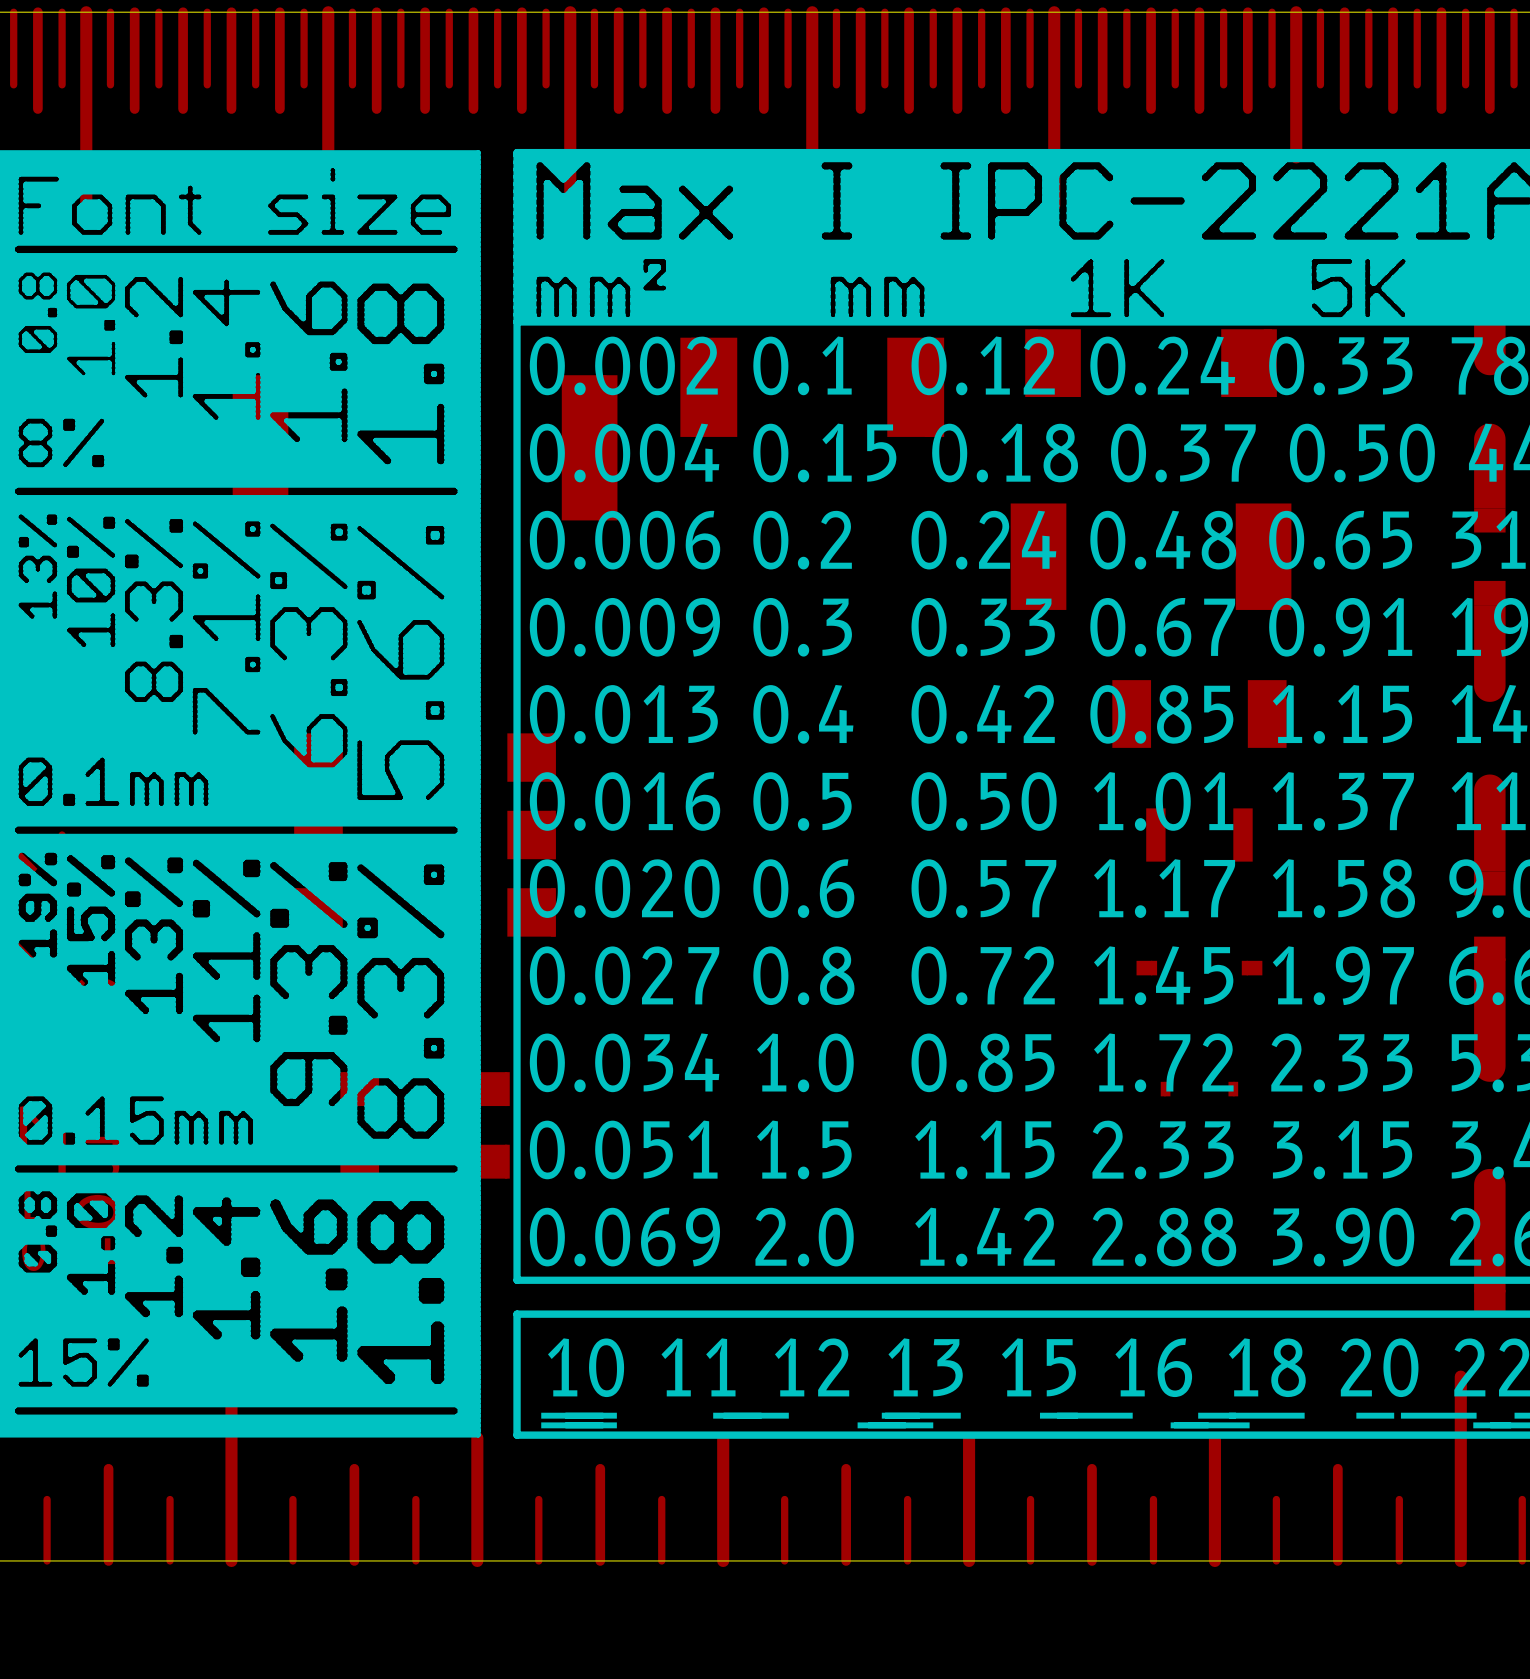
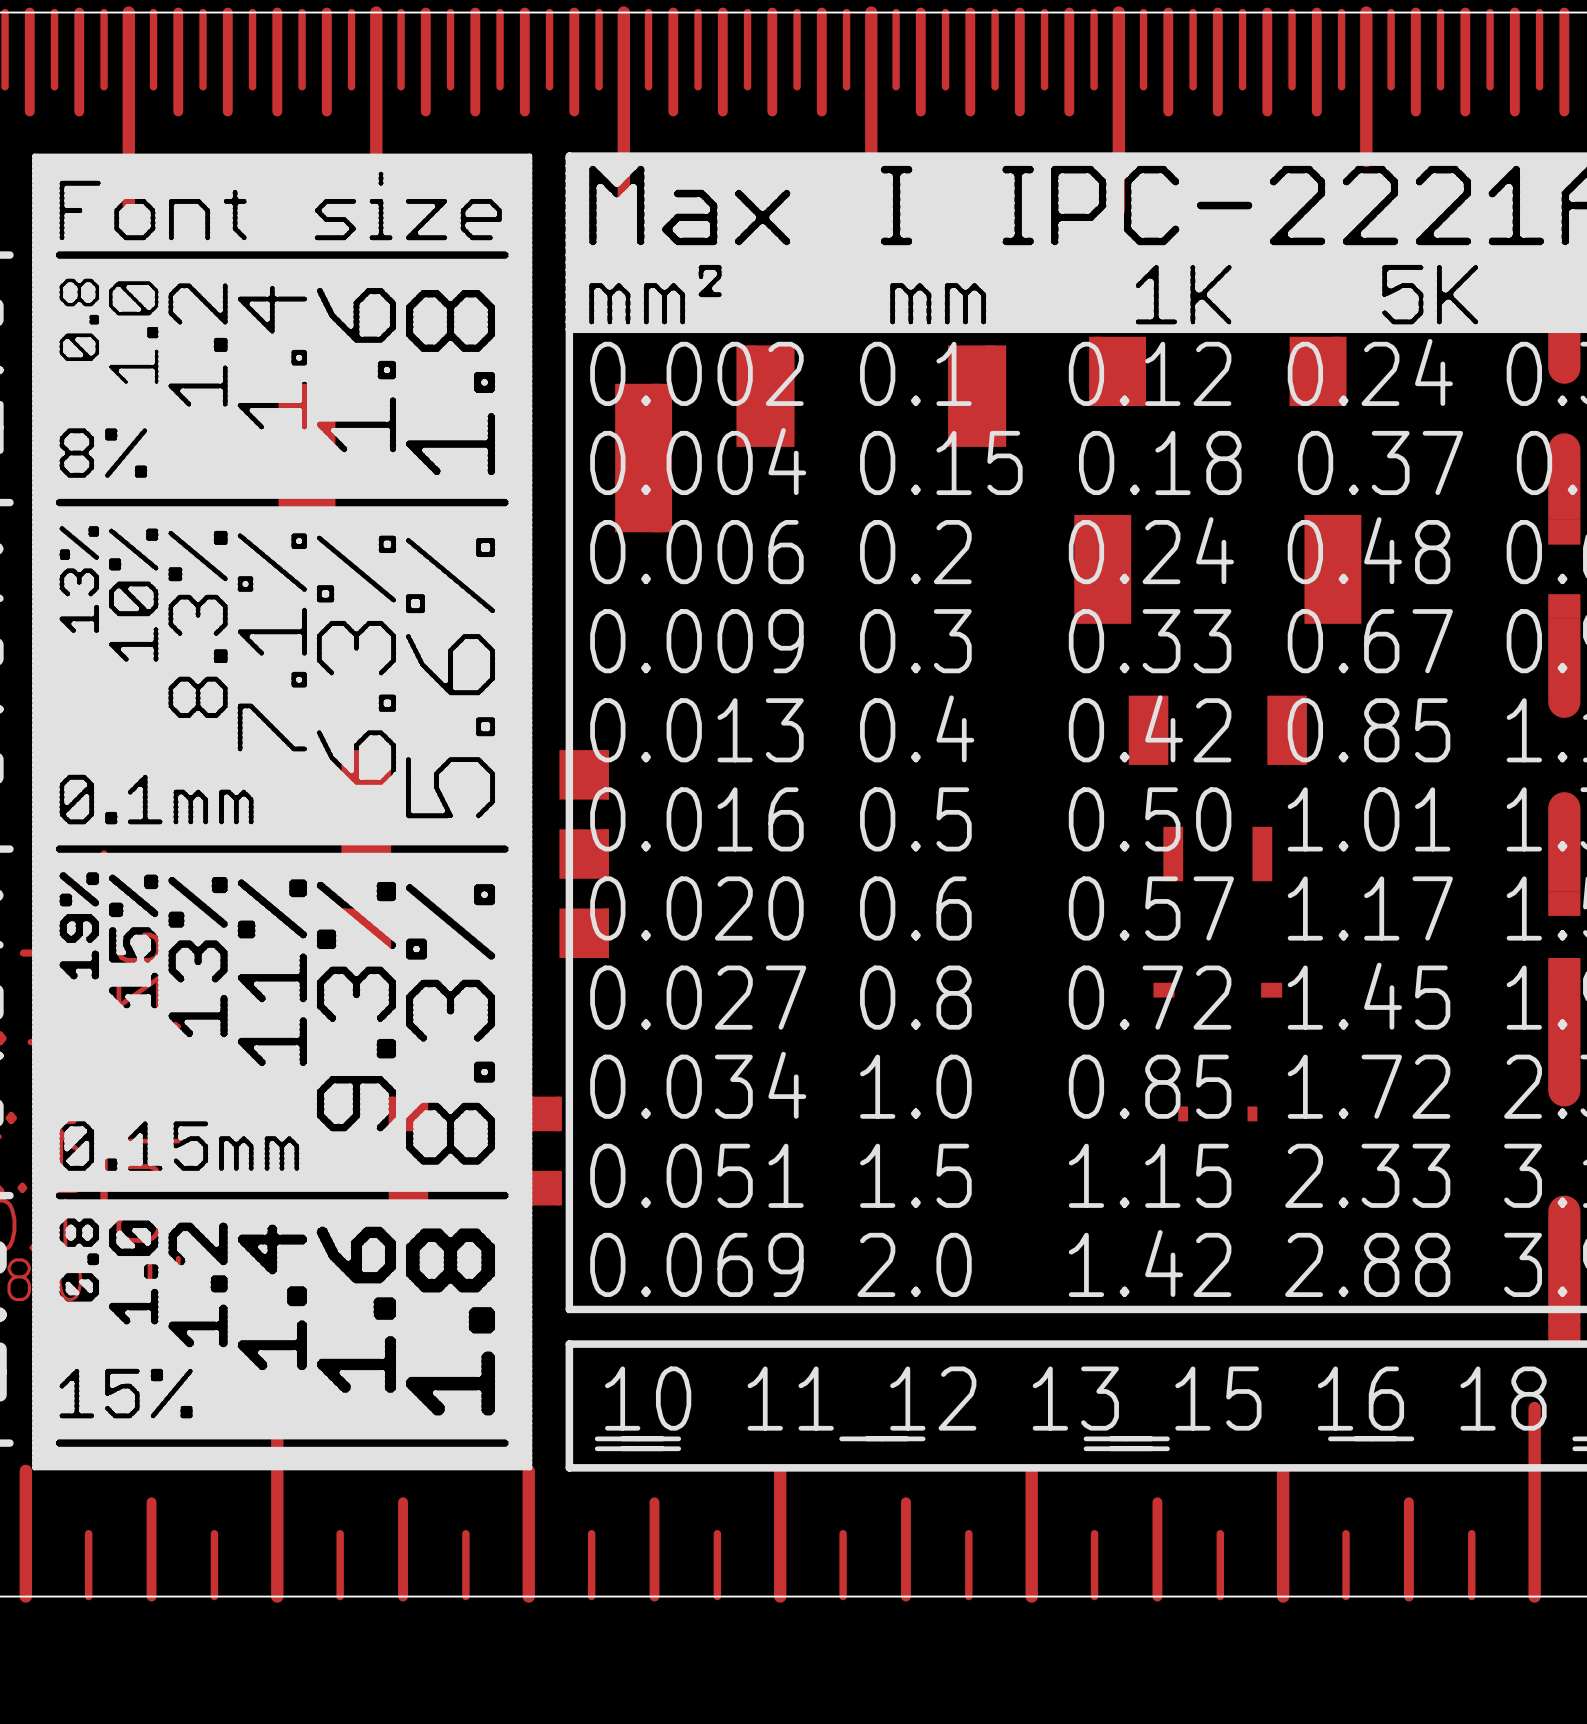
part position: (1199, 714) -> (1217, 730)
part position: (1199, 835) -> (1217, 854)
part position: (1199, 968) -> (1217, 990)
part position: (1199, 1089) -> (1217, 1113)

